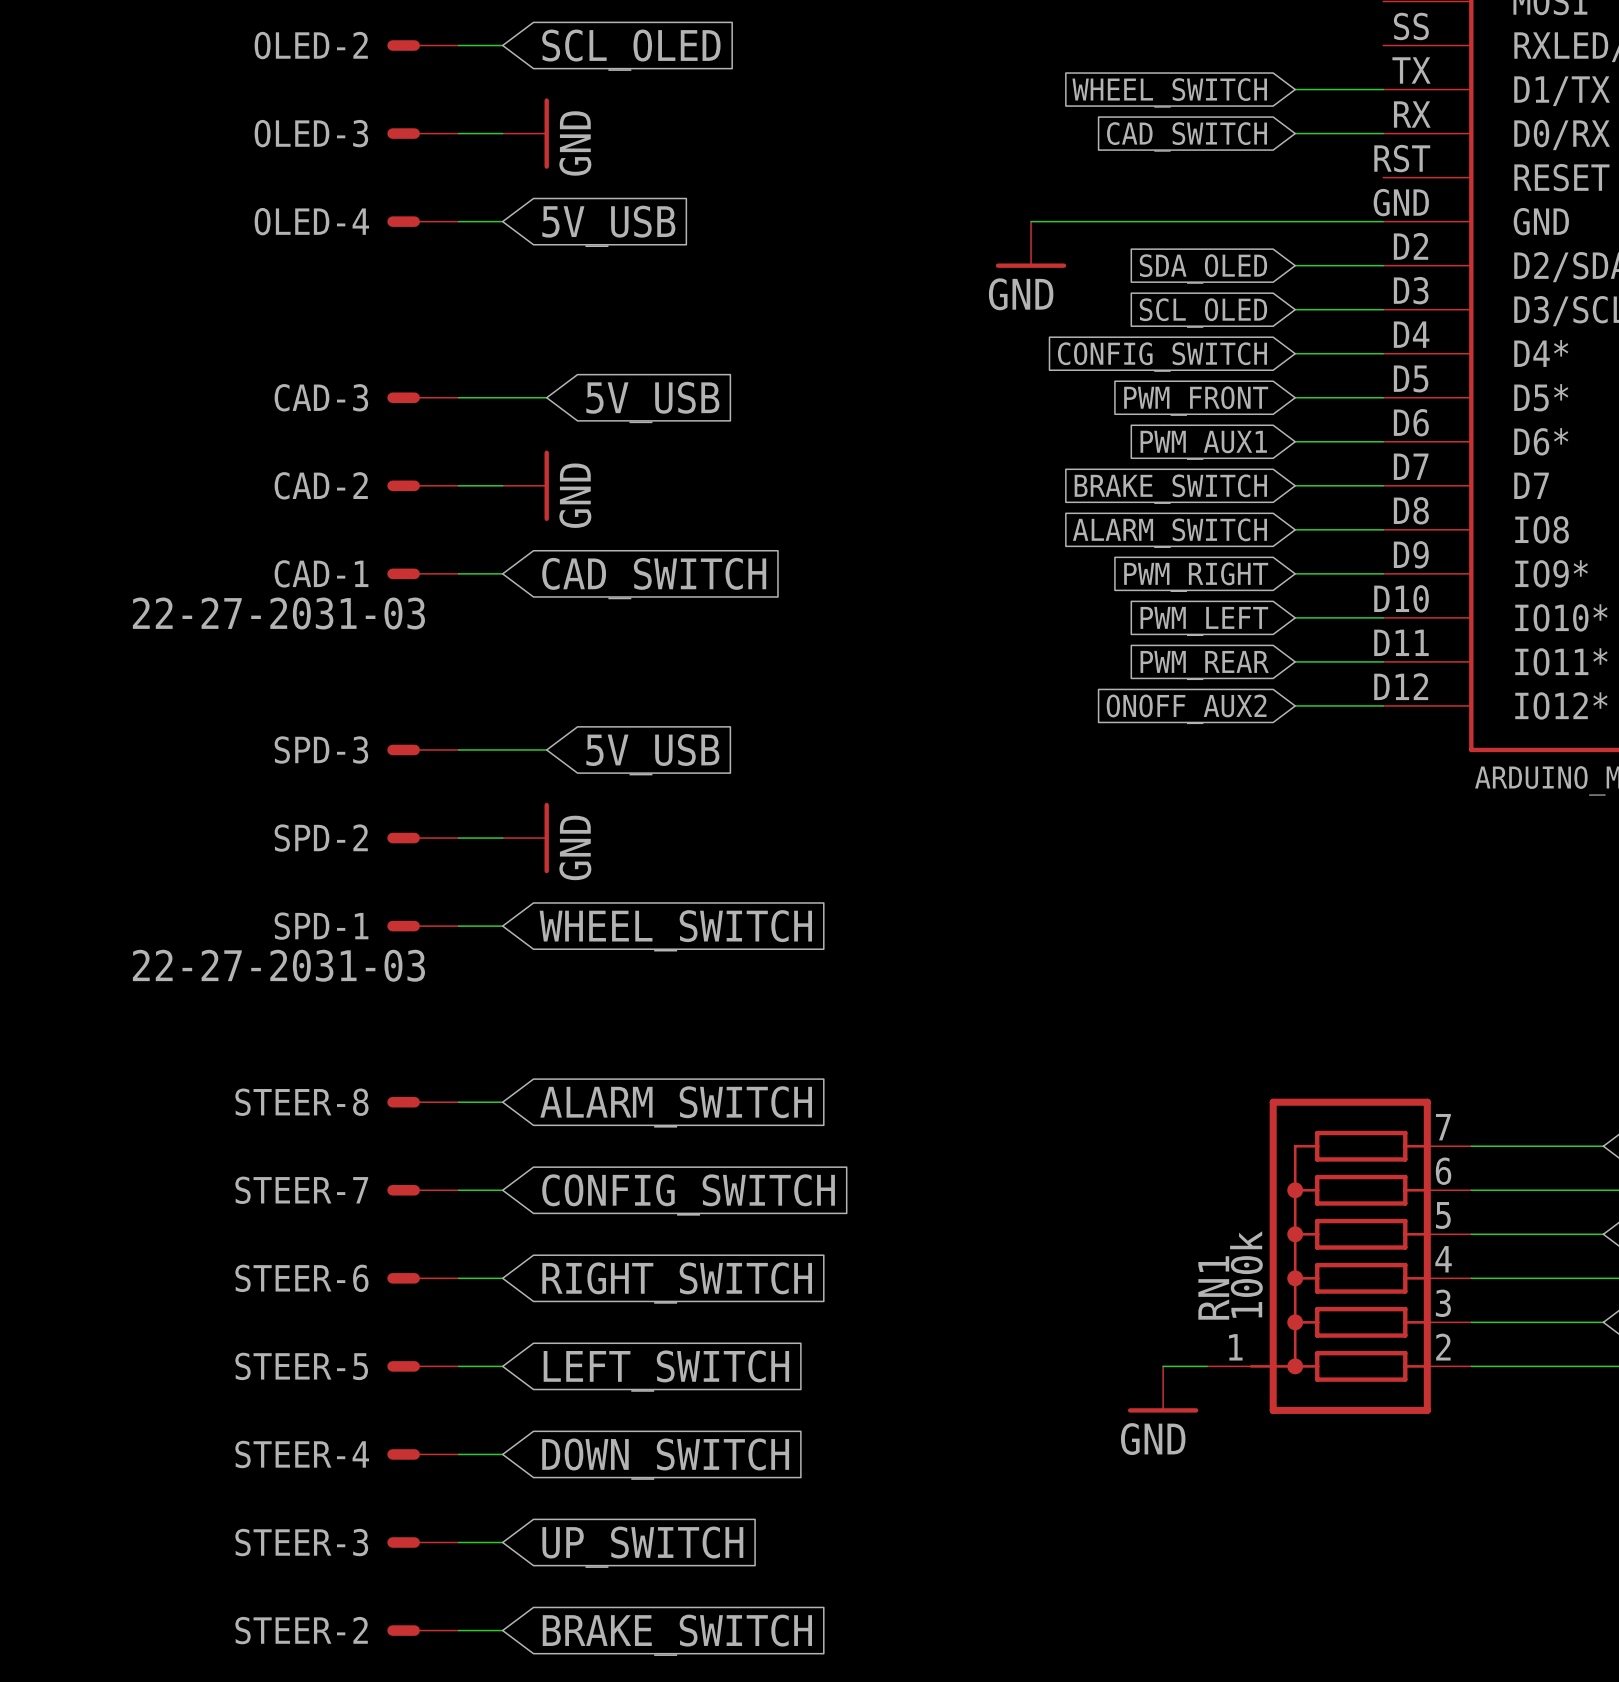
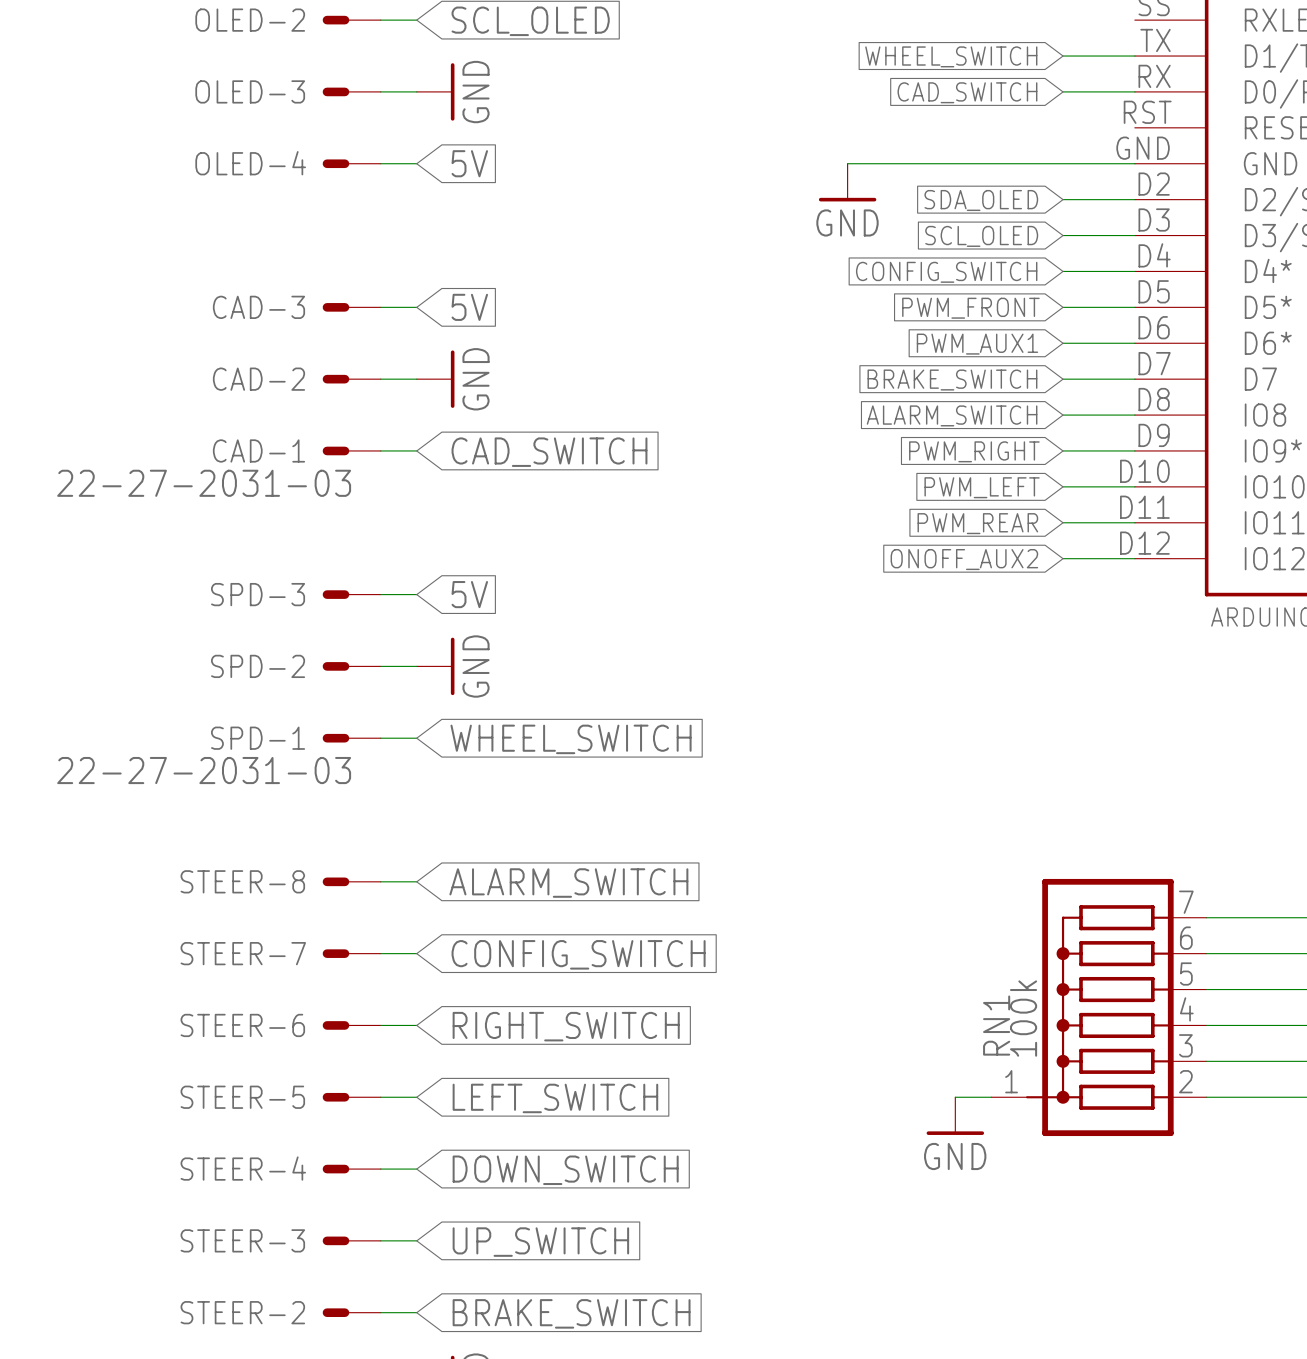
global label: 5V_USB (608, 226) -> 5V (469, 163)
wire: (502, 397) (546, 397) -> none
global label: none -> 5V (469, 307)
global label: 5V_USB (652, 402) -> none
wire: (502, 749) (546, 749) -> none
global label: none -> 5V (469, 594)
global label: 5V_USB (652, 754) -> none

